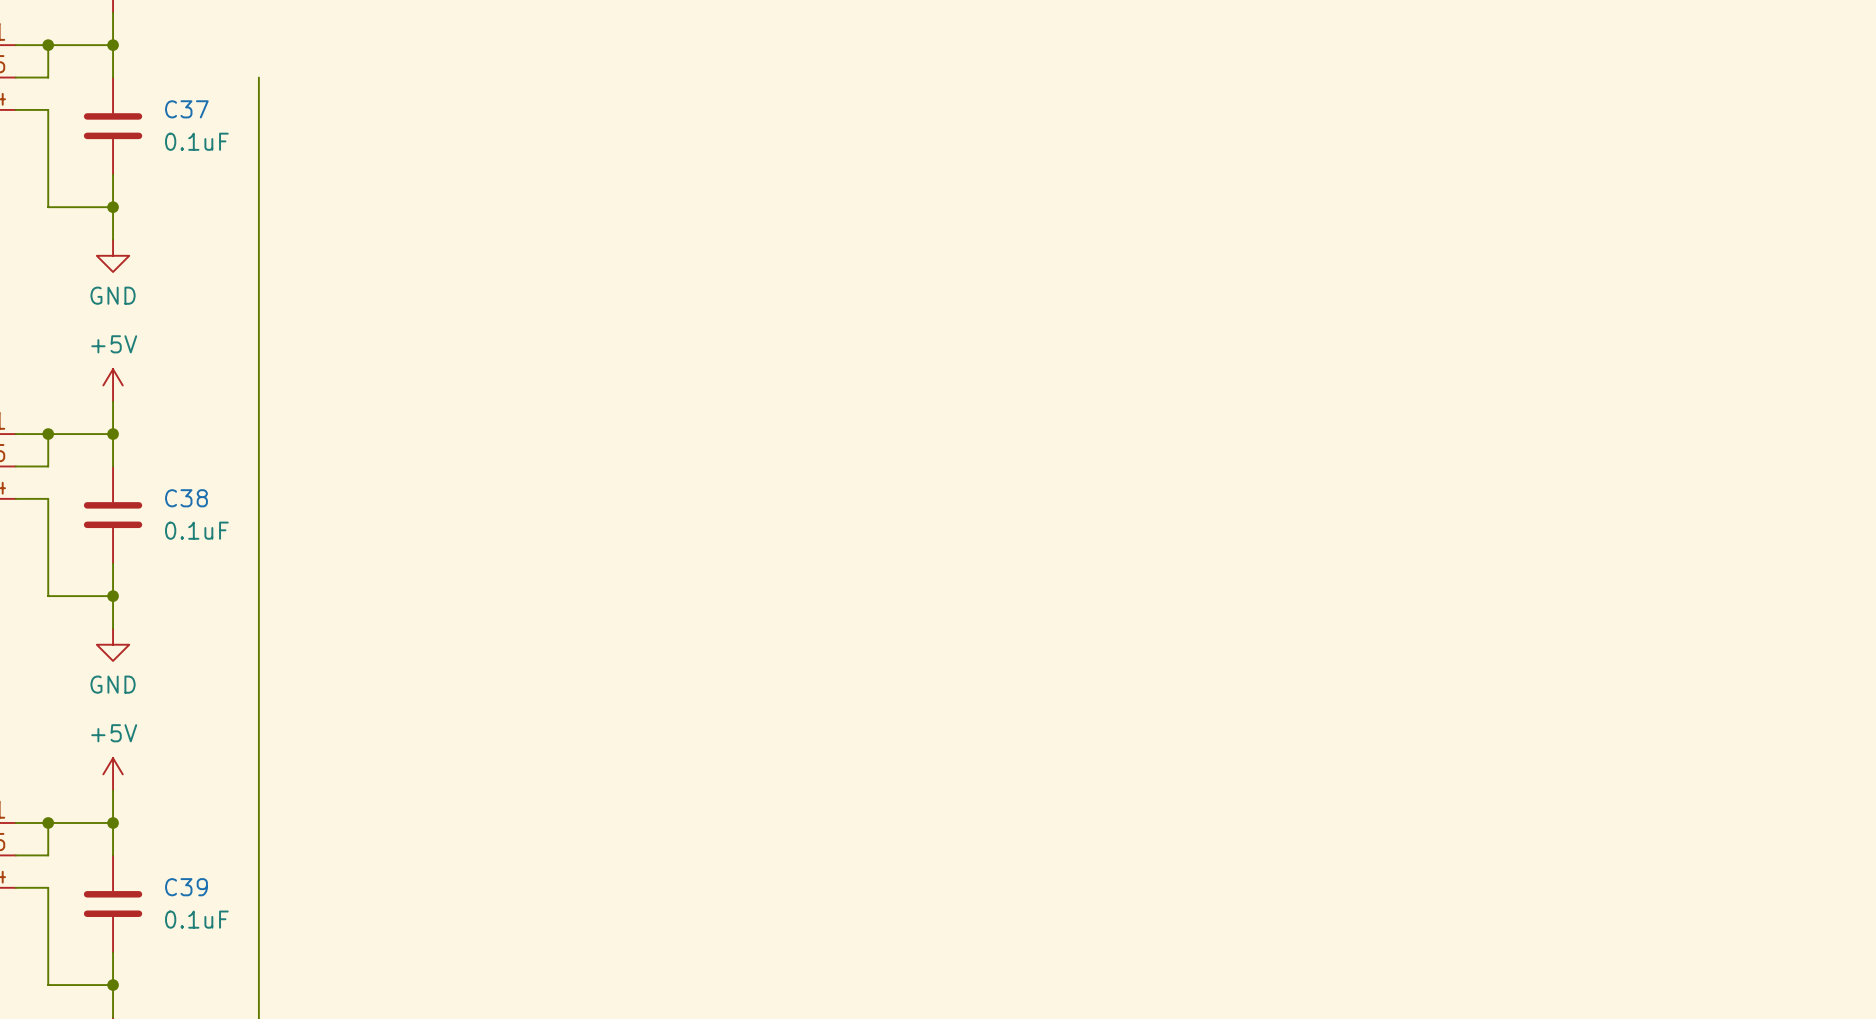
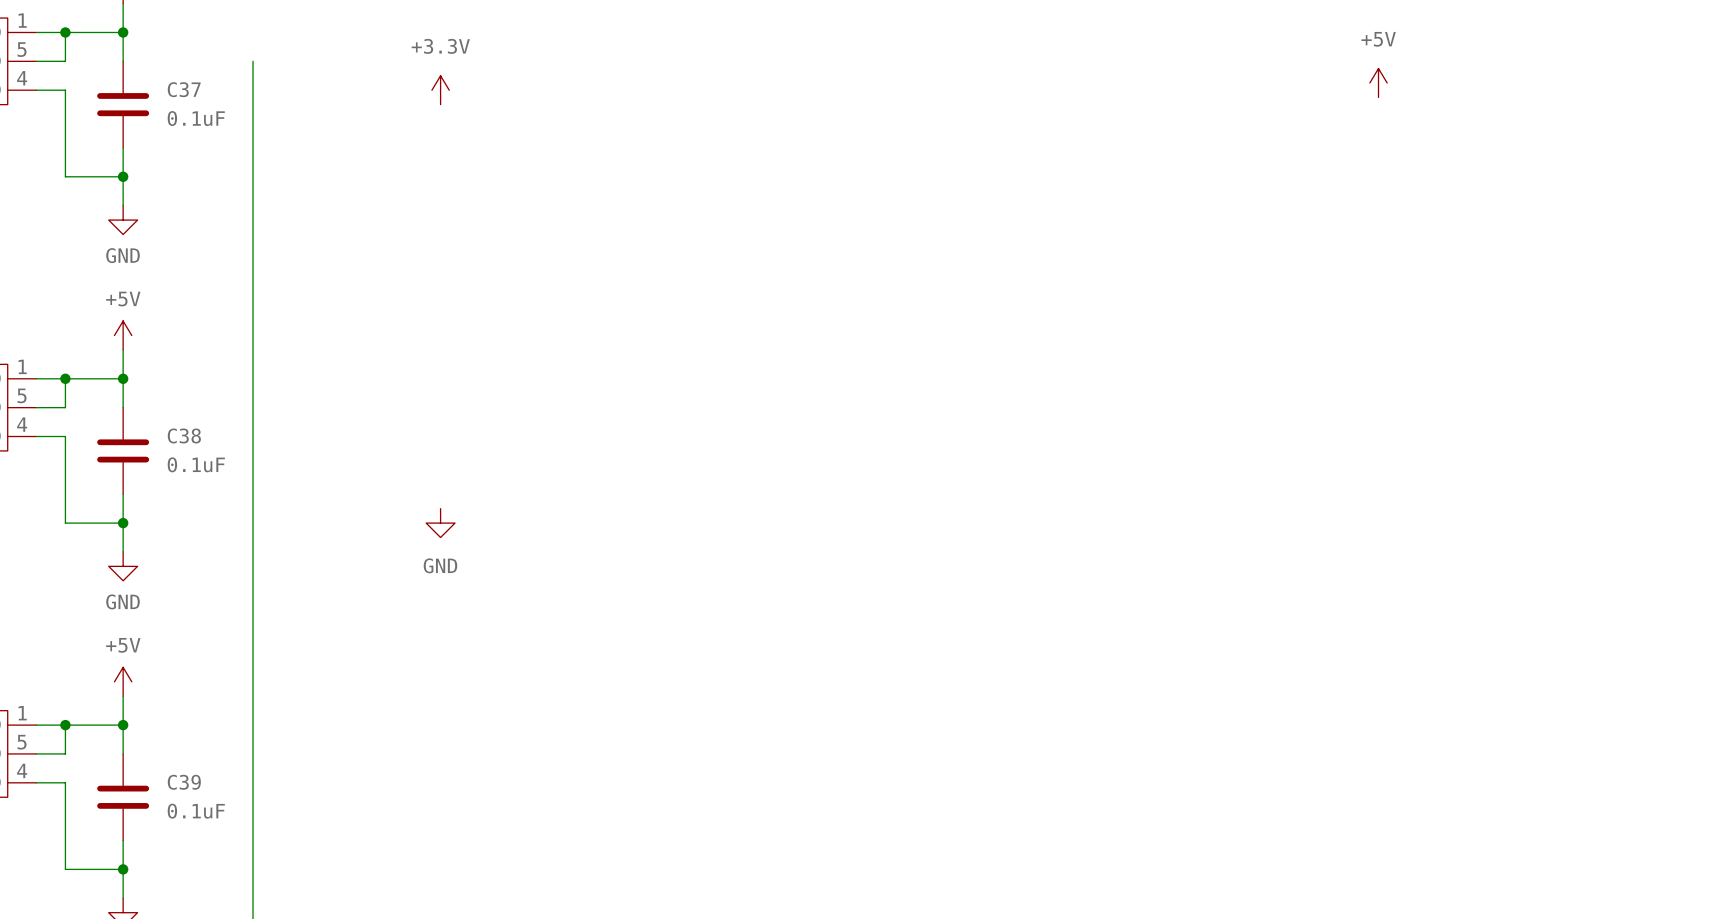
power symbol: none -> +5V (1378, 82)
power symbol: none -> +3.3V (440, 90)
power symbol: none -> GND (440, 523)

